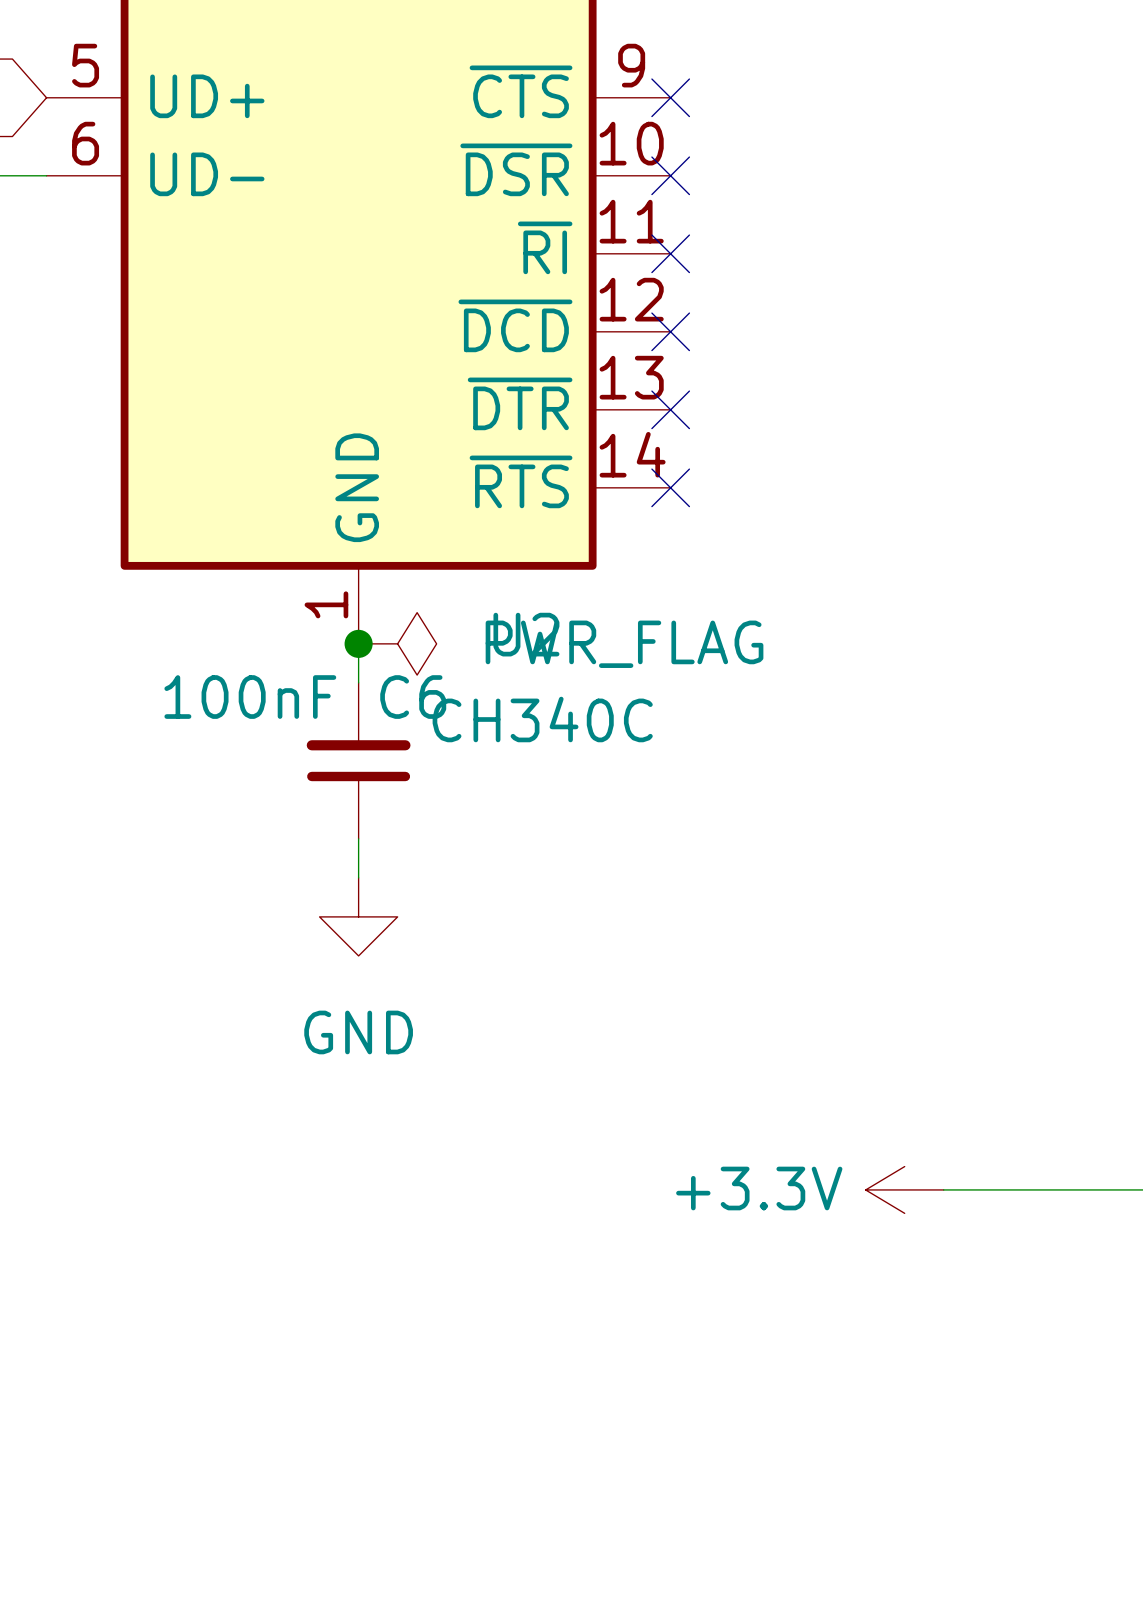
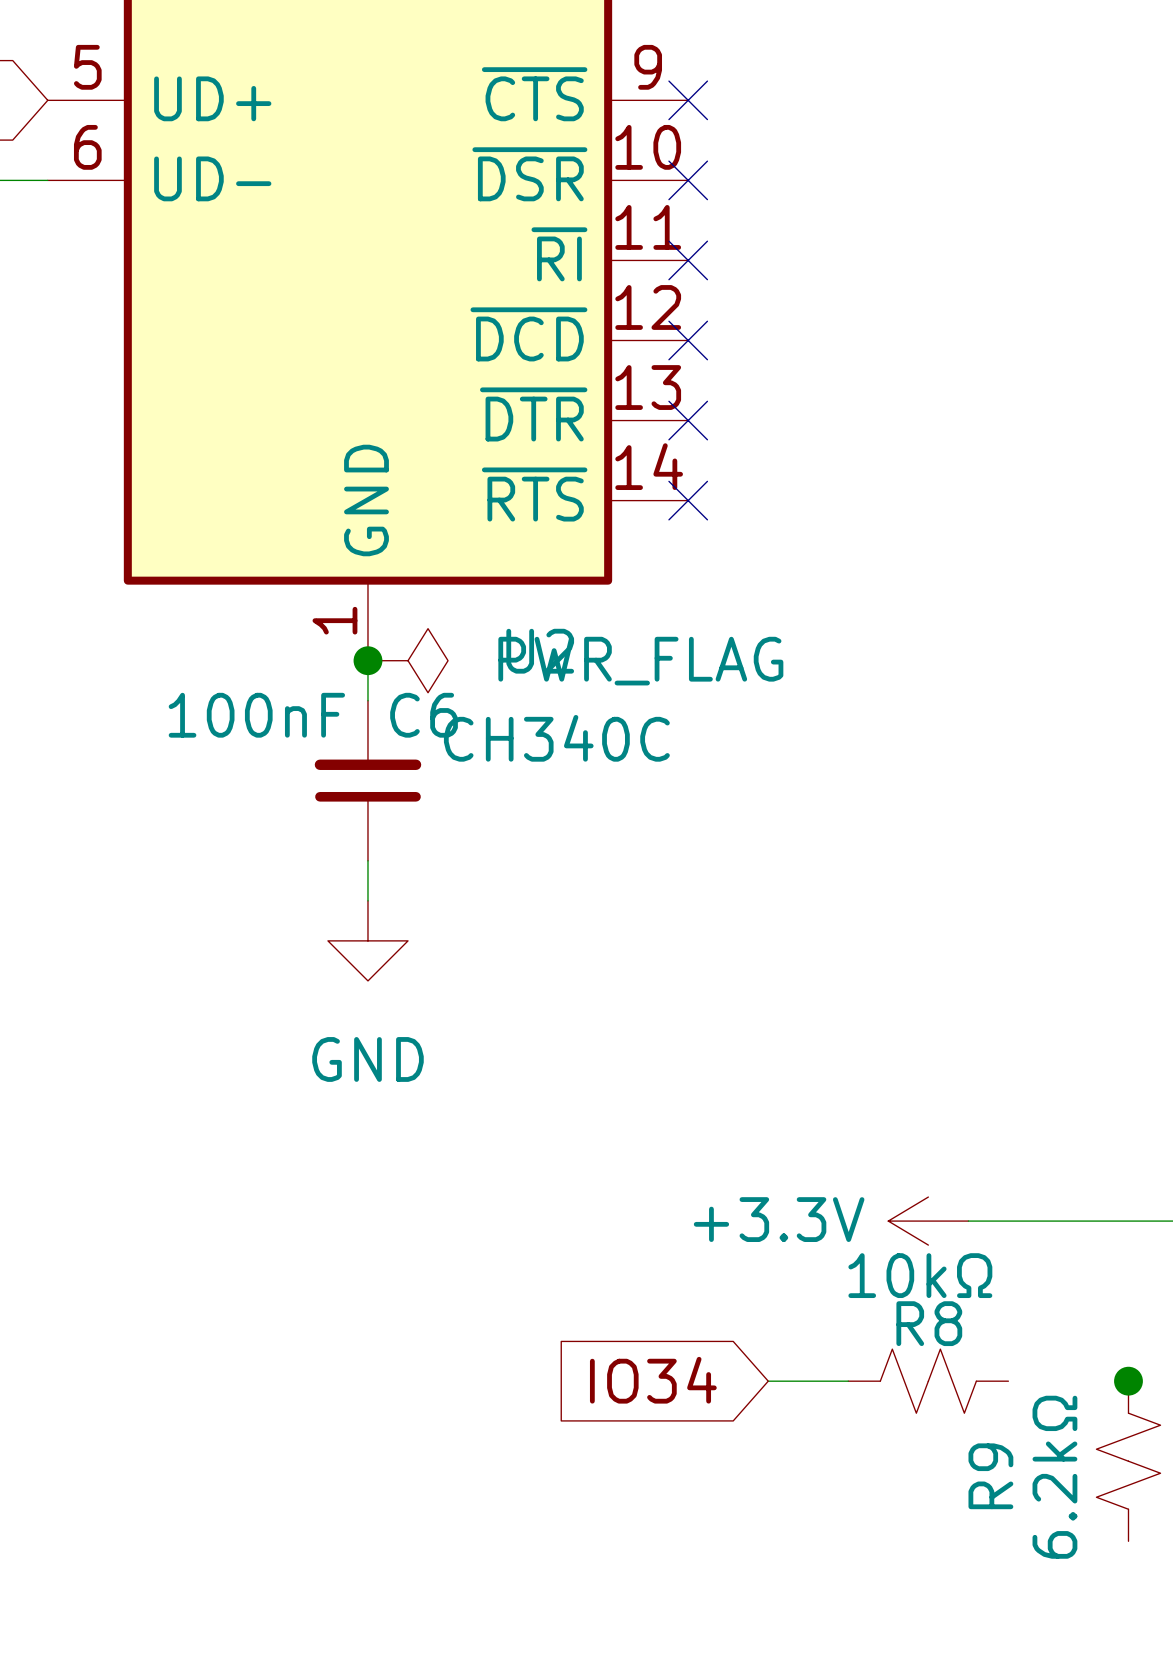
global label: none -> IO34 (653, 1380)
wire: none -> (768, 1381) (848, 1381)
R8: none -> 10kΩ (928, 1381)
junction: none -> (1128, 1381)
R9: none -> 6.2kΩ (1128, 1461)

